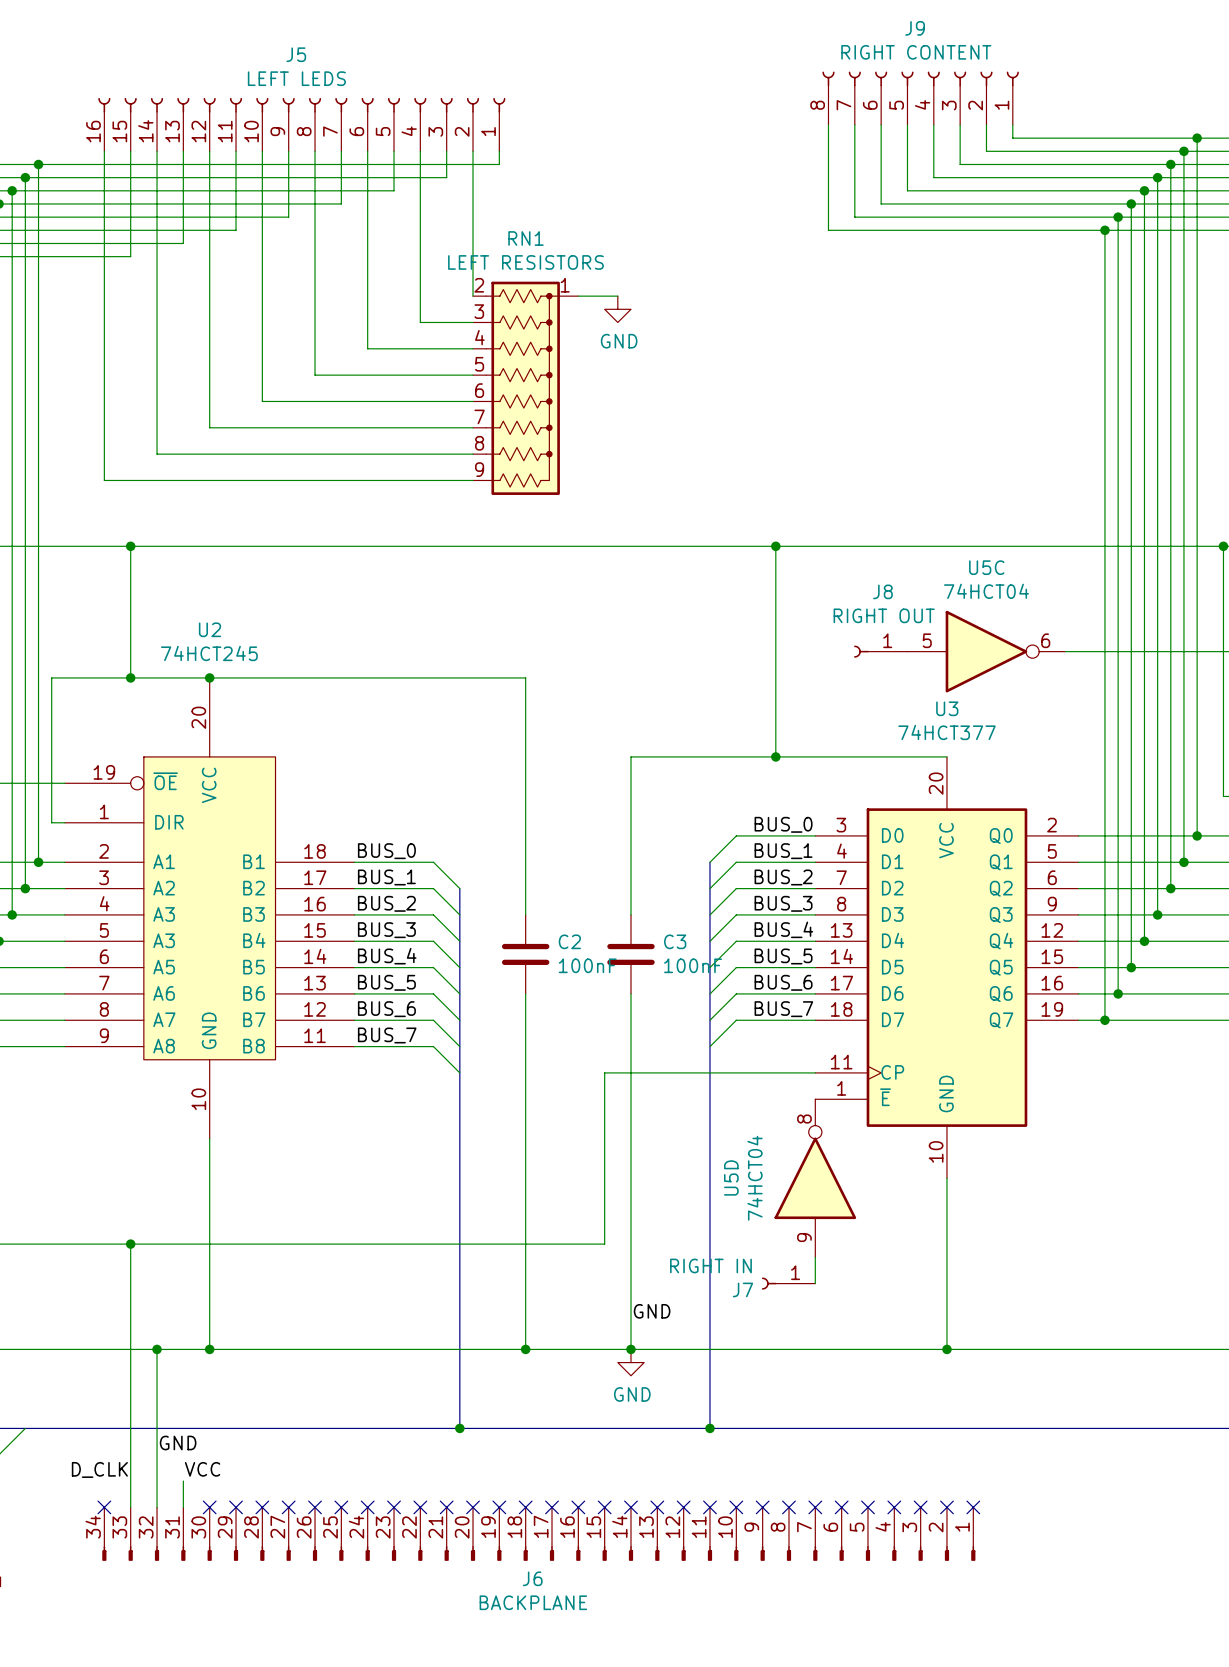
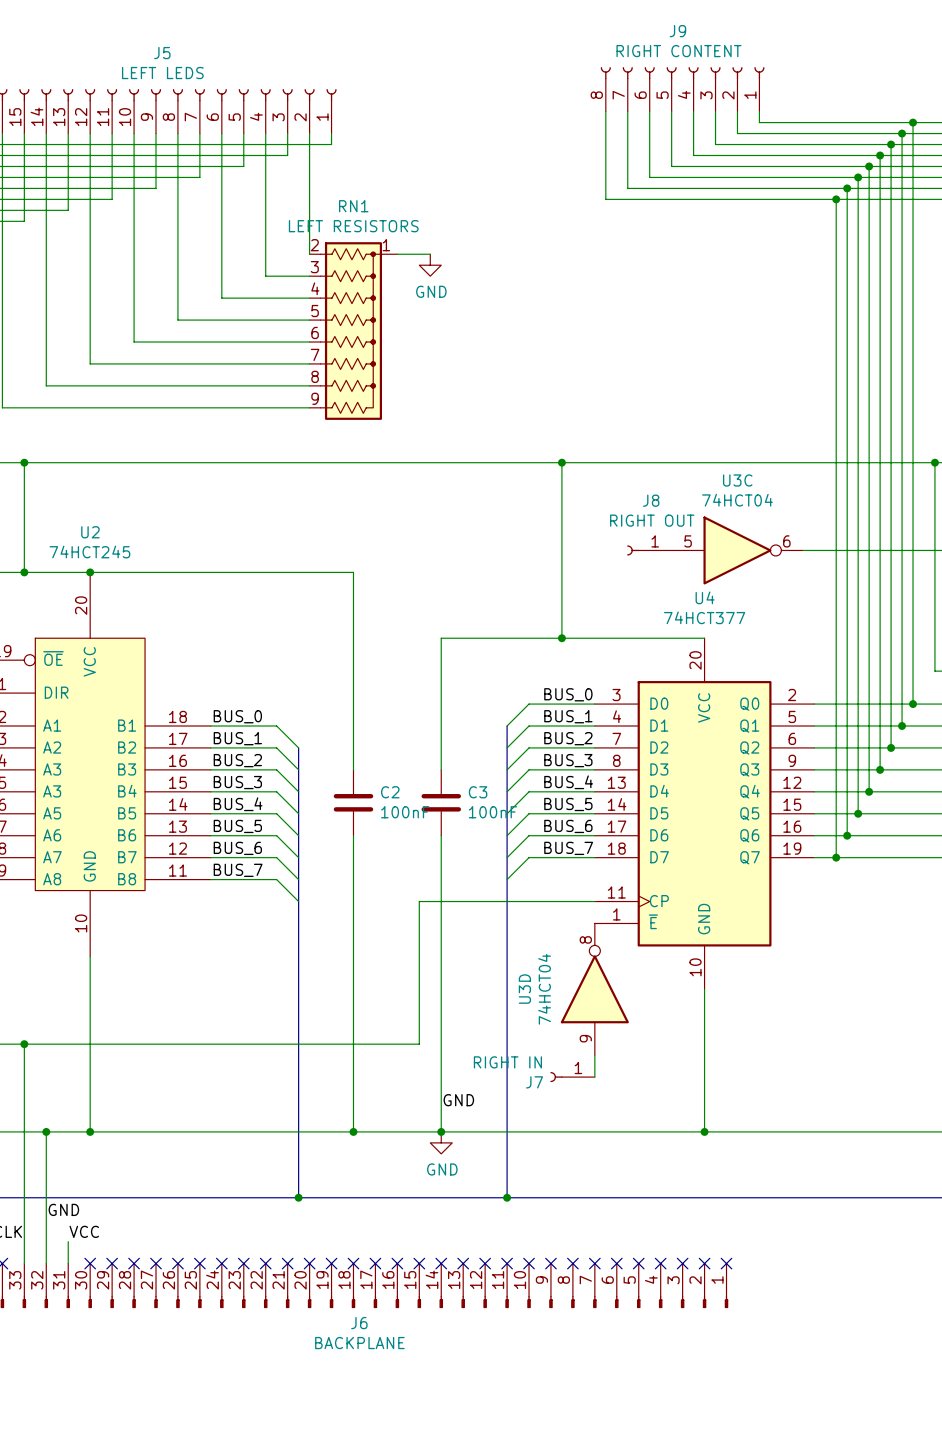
U5C name: U5C (986, 567) -> U3C (737, 480)
U3 name: U3 (947, 708) -> U4 (705, 597)
U5D name: U5D (731, 1177) -> U3D (524, 989)

